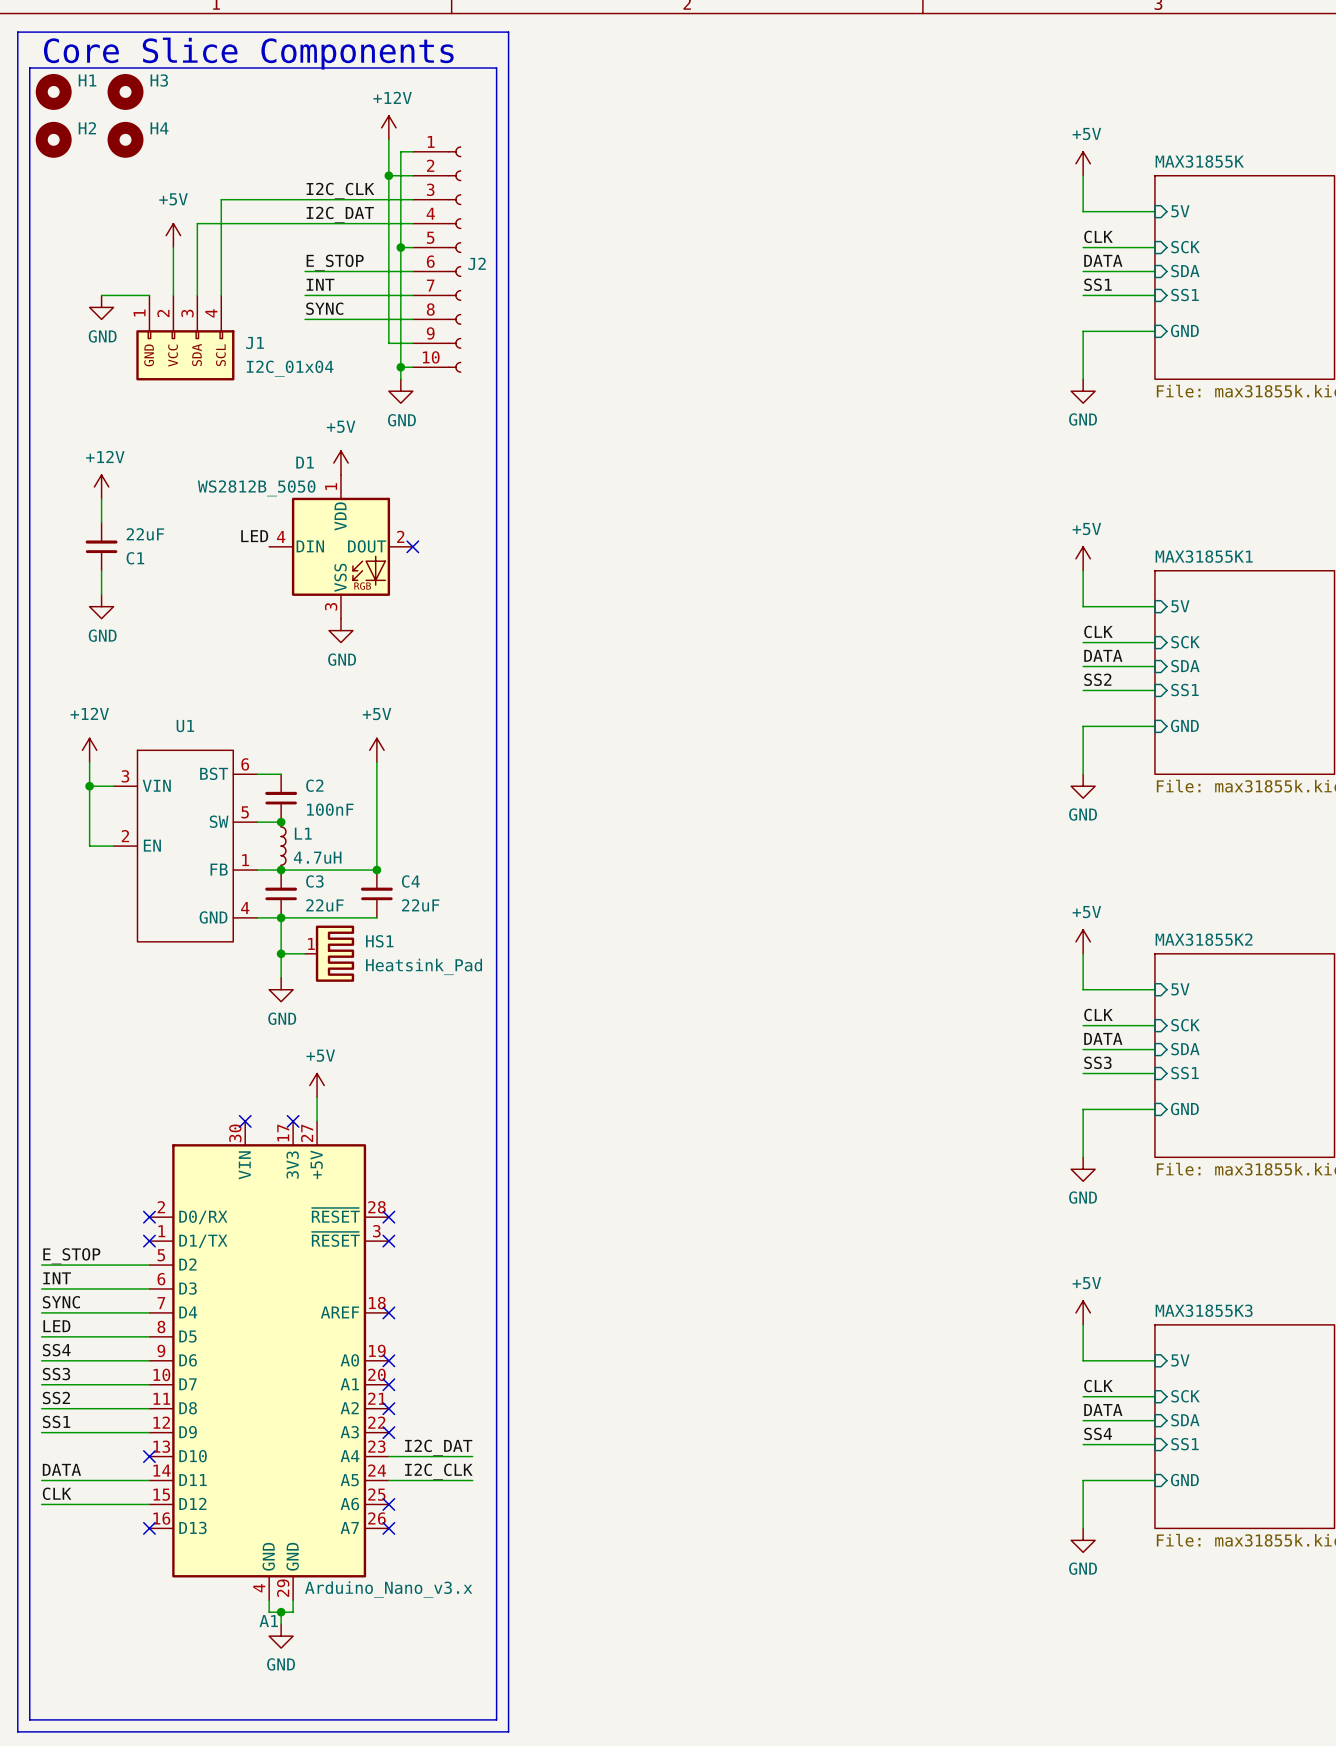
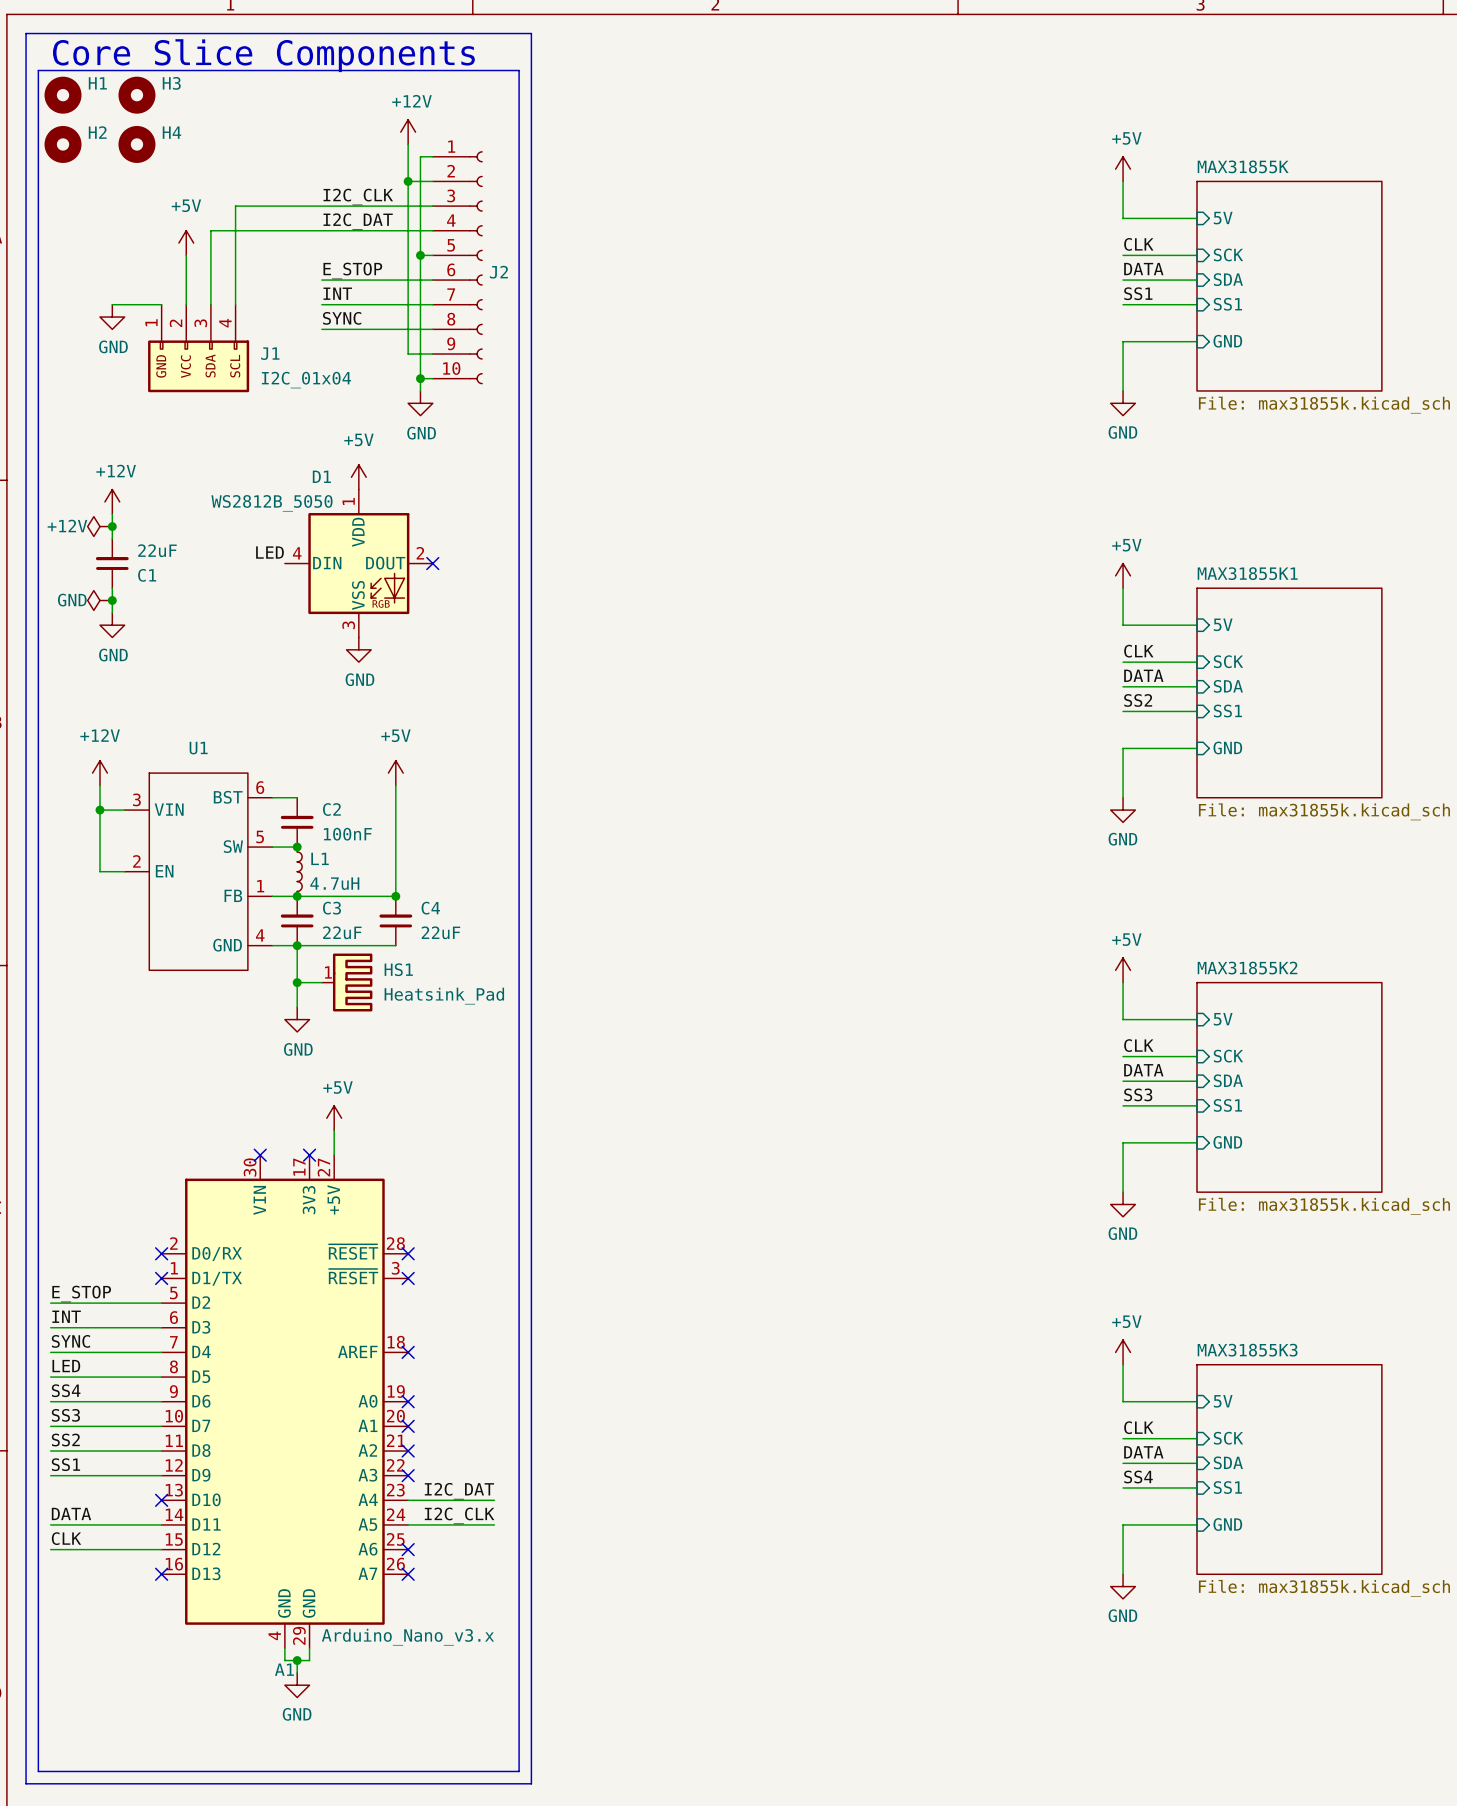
power symbol: none -> +12V (99, 526)
junction: none -> (112, 526)
power symbol: none -> GND (99, 600)
junction: none -> (112, 600)

